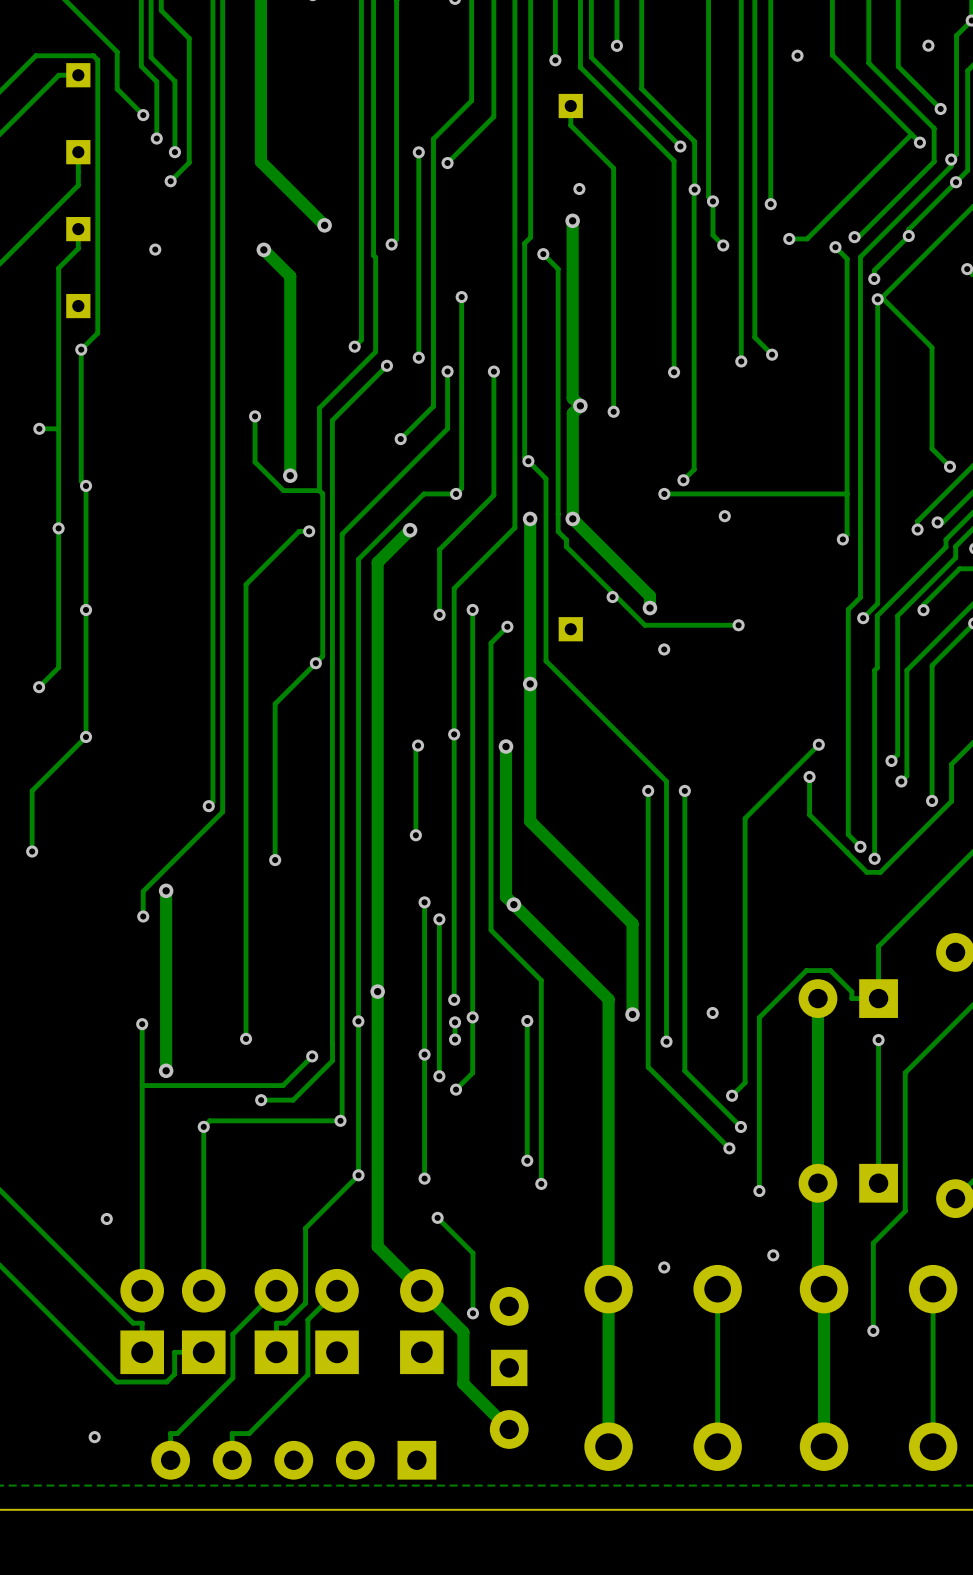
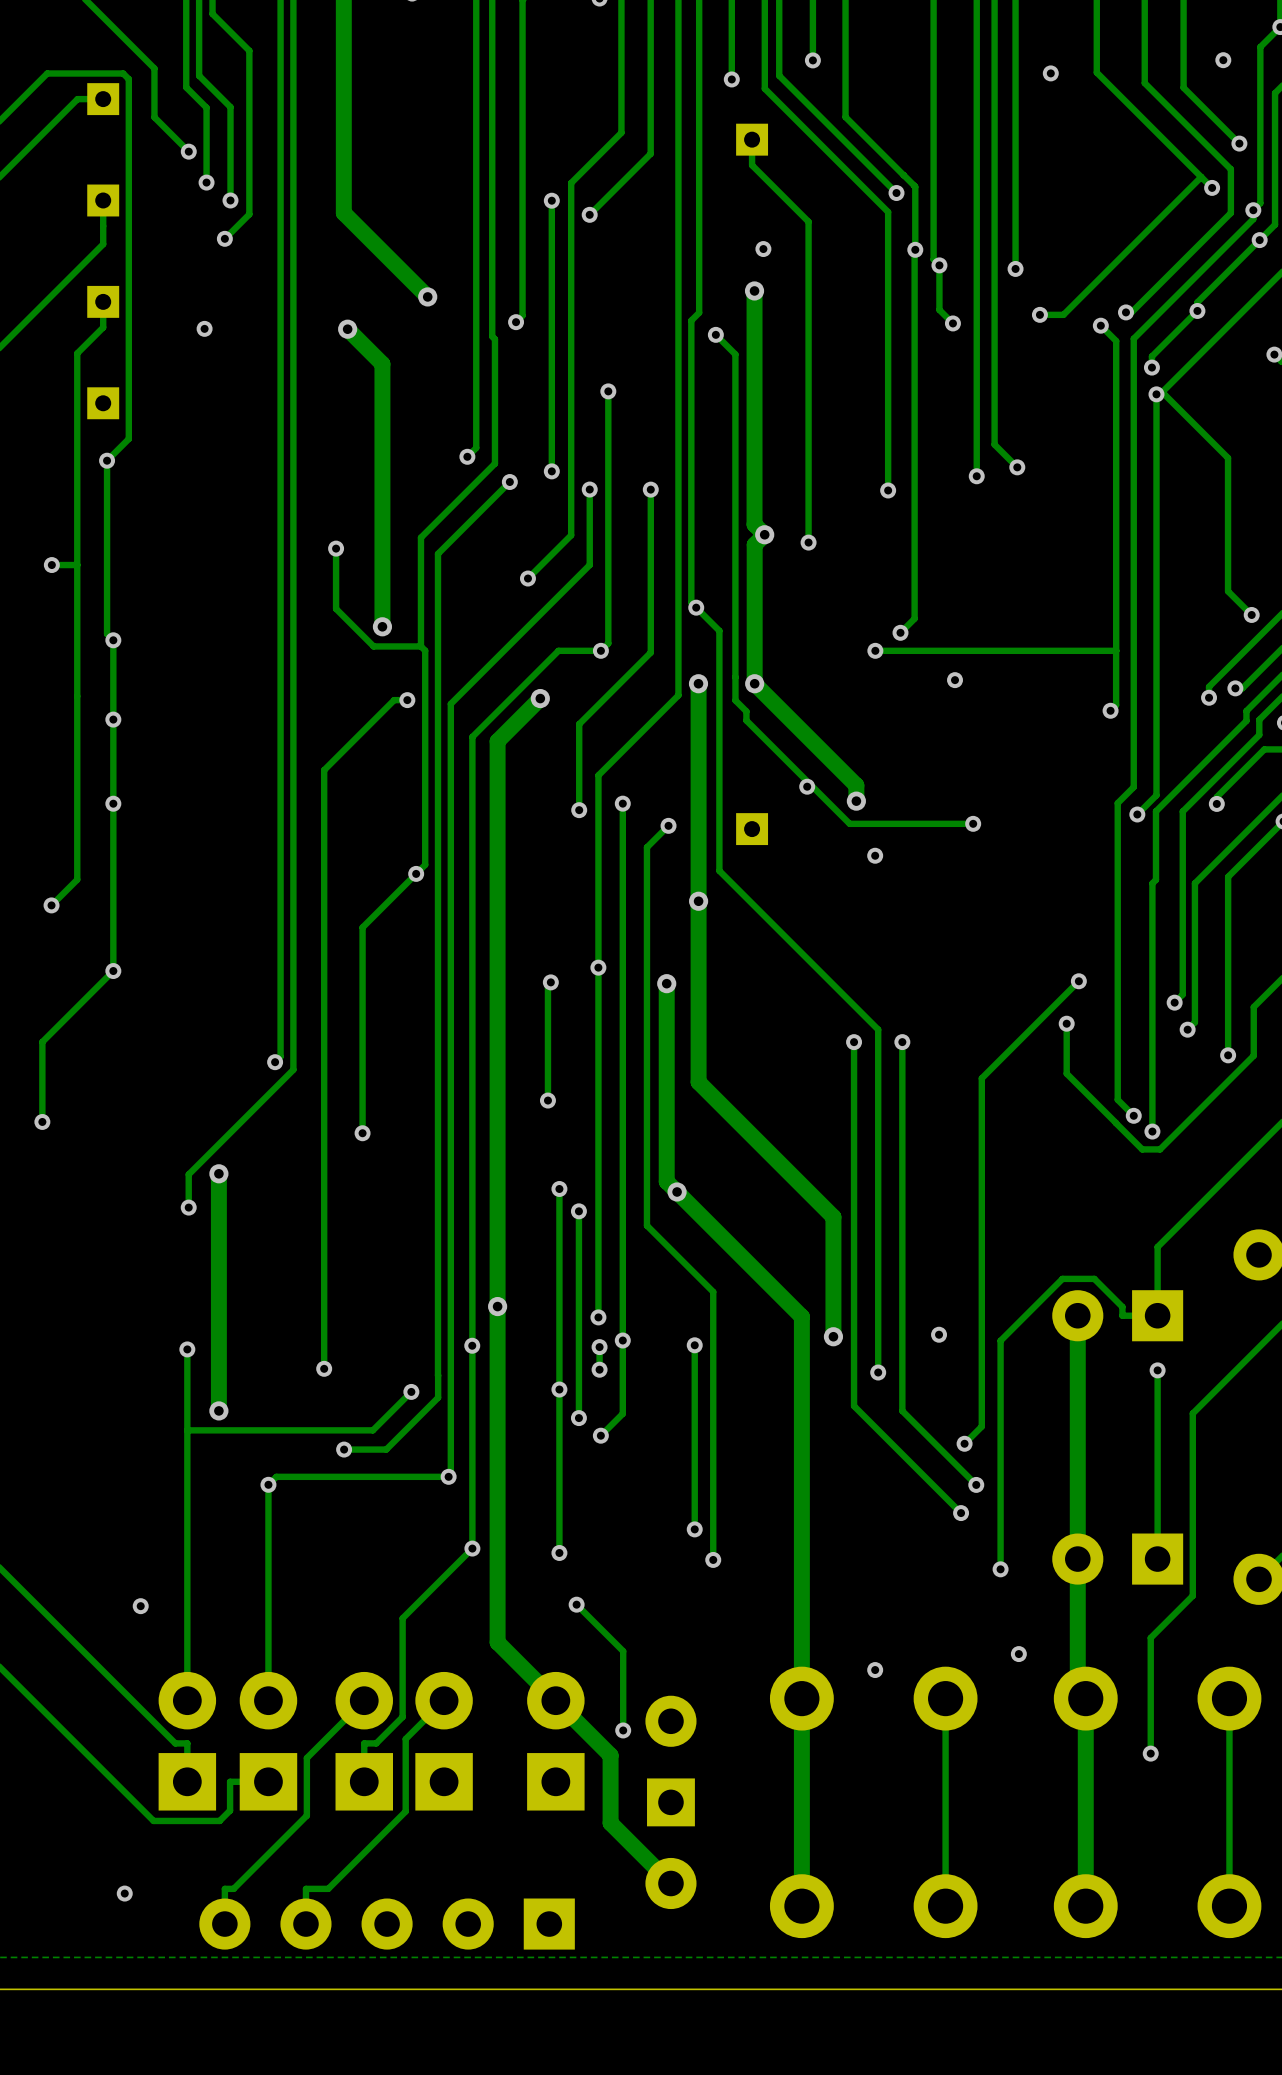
via position: (58, 528) -> (113, 719)

